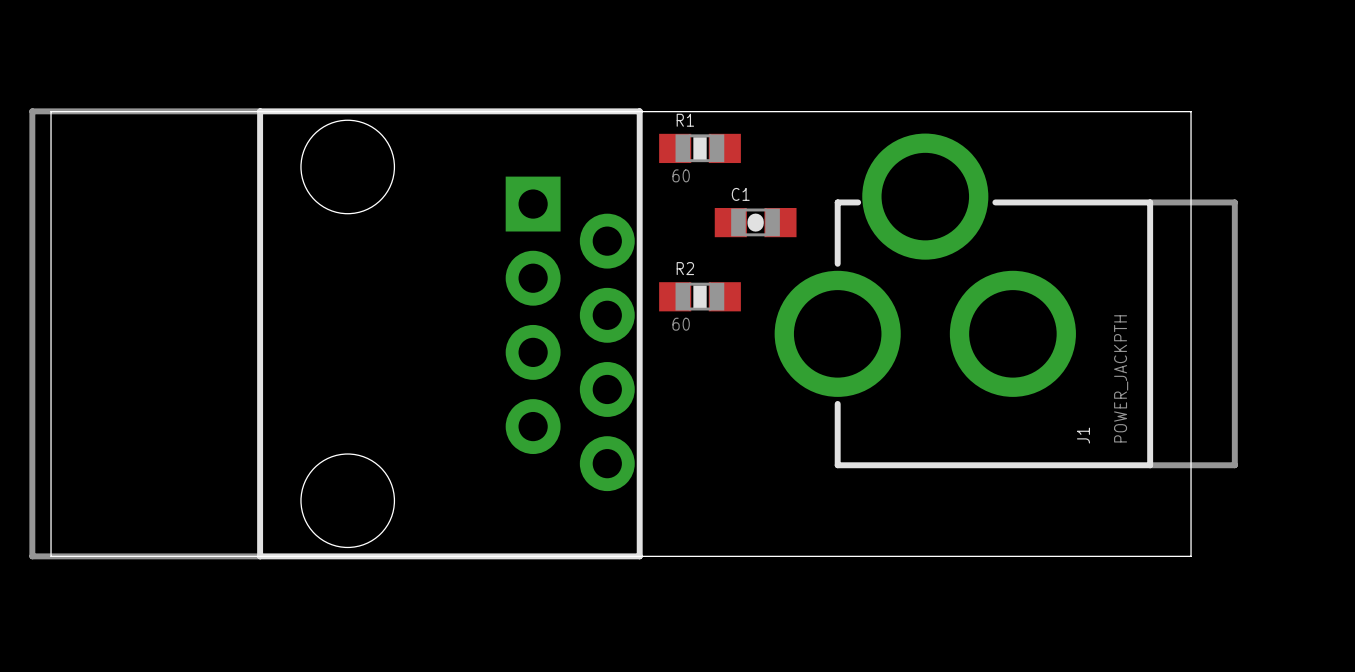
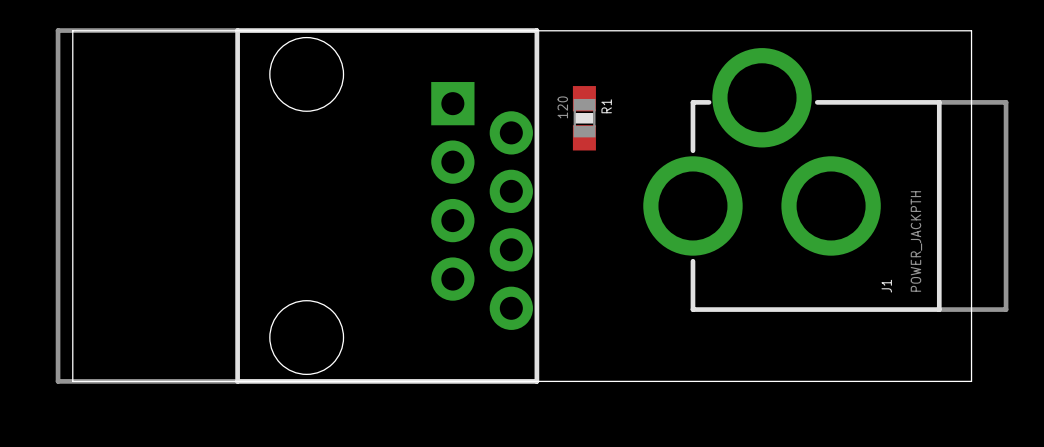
R1 rotation: 0° (700, 148) -> 90° clockwise (584, 118)
R1 position: (700, 148) -> (584, 118)
R1 value: 60 (681, 175) -> 120 (562, 107)
C1: (755, 222) -> none
R2: 60 (700, 296) -> none

